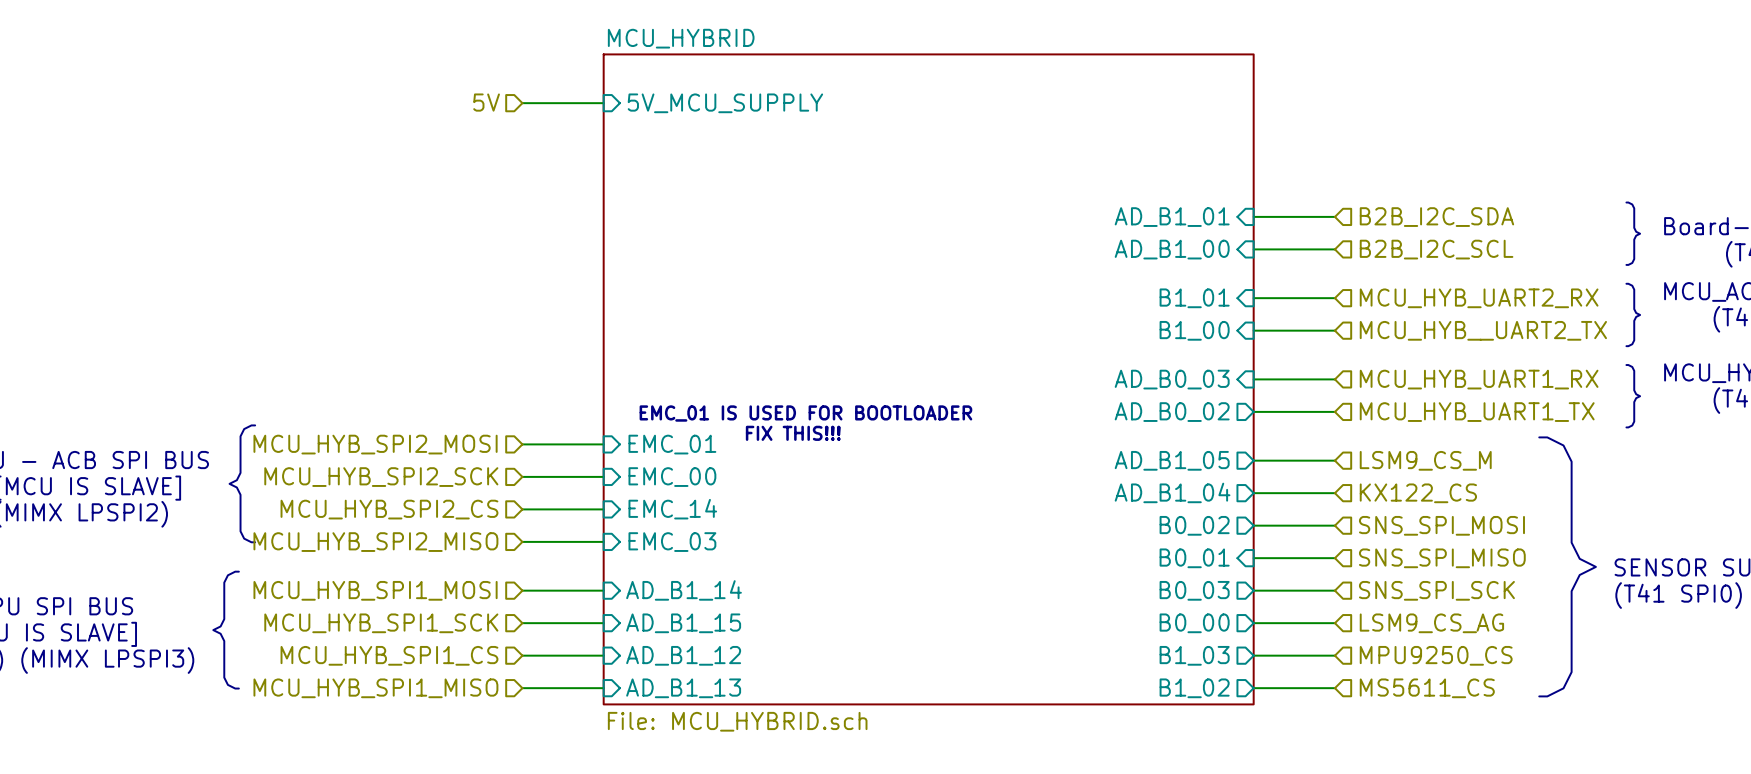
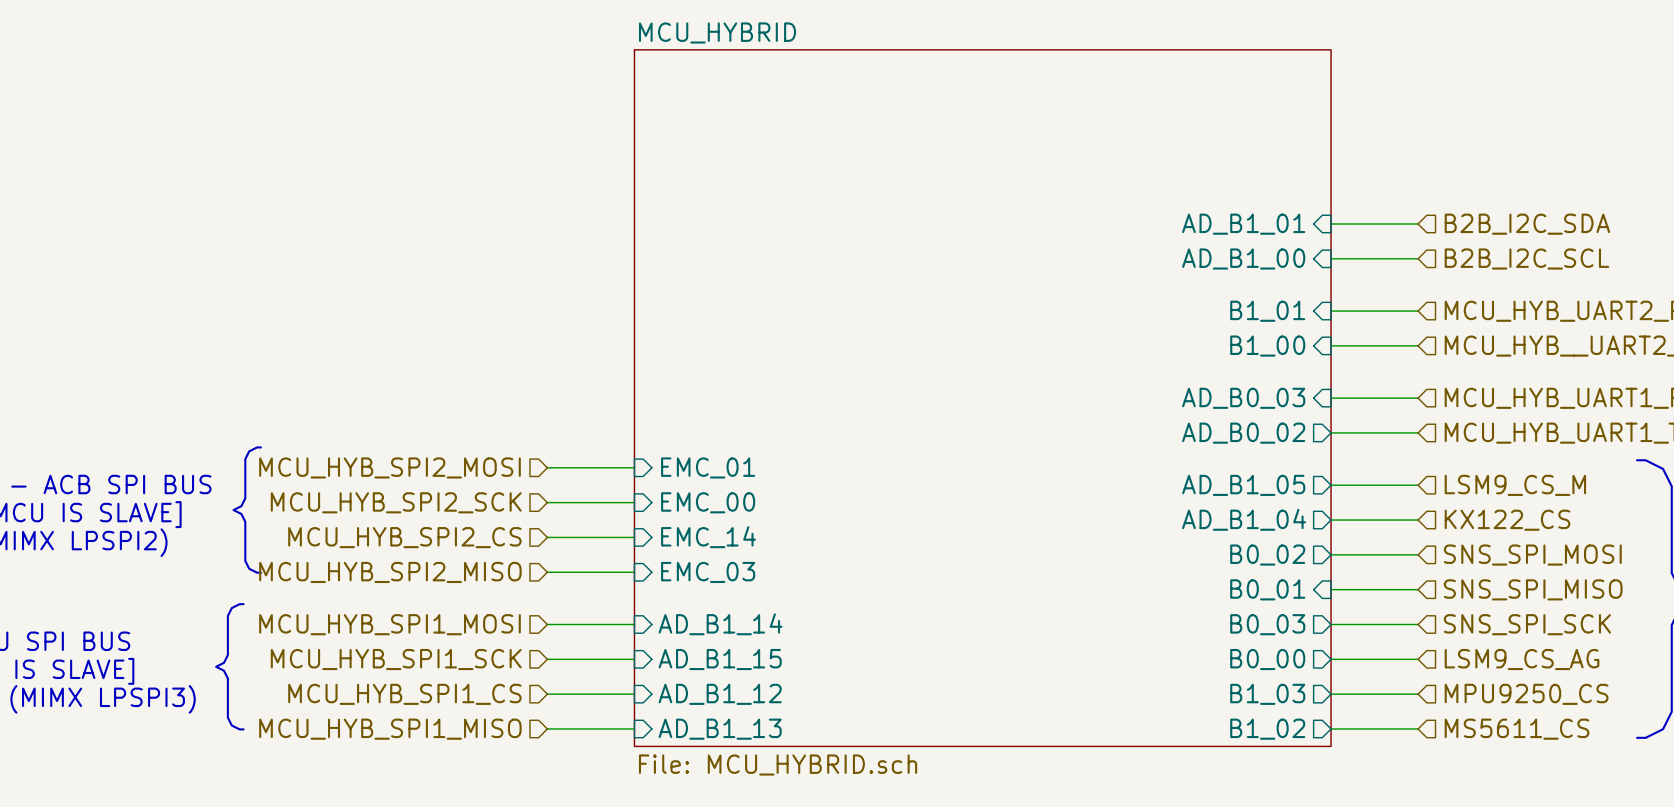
hierarchical label: 5V (486, 102) -> none
wire: (522, 103) (603, 103) -> none
sheet pin: 5V_MCU_SUPPLY (725, 103) -> none
text: EMC_01 IS USED FOR BOOTLOADER (805, 413) -> none
text: FIX THIS!!! (793, 433) -> none

